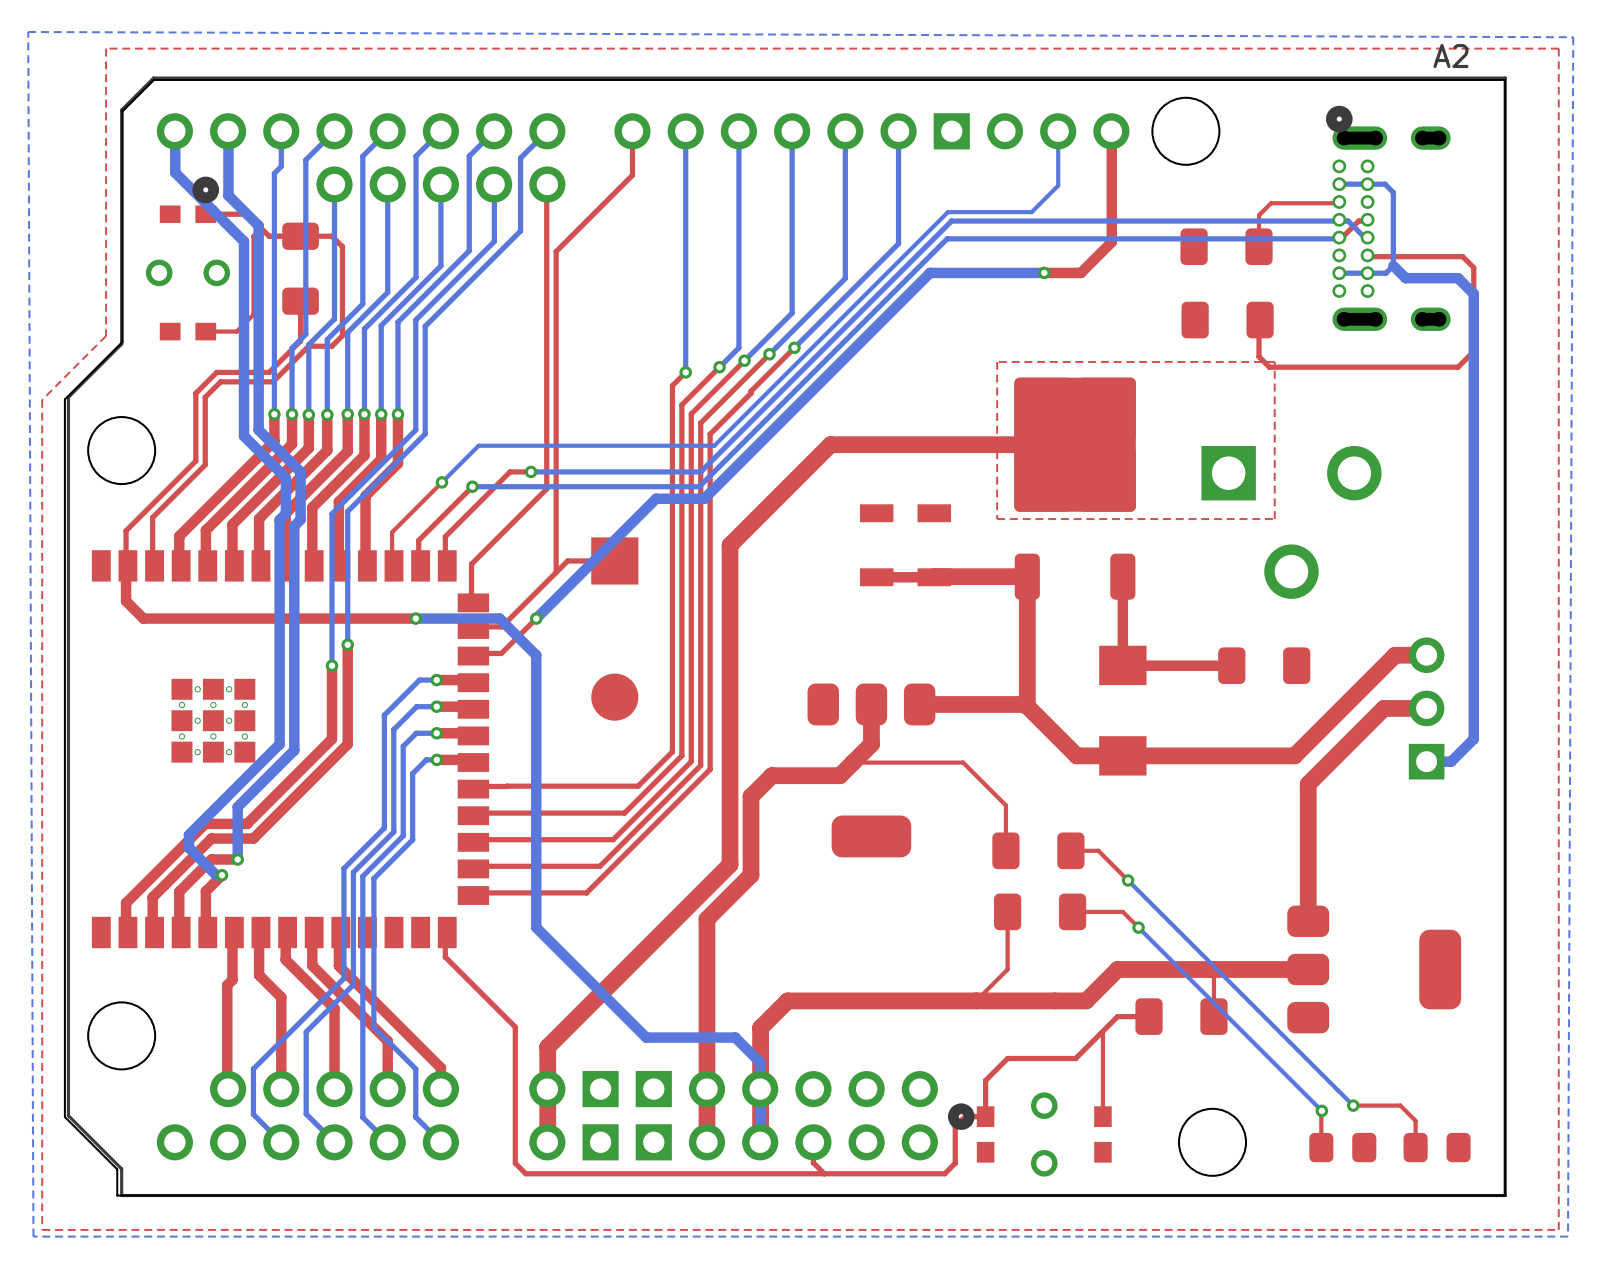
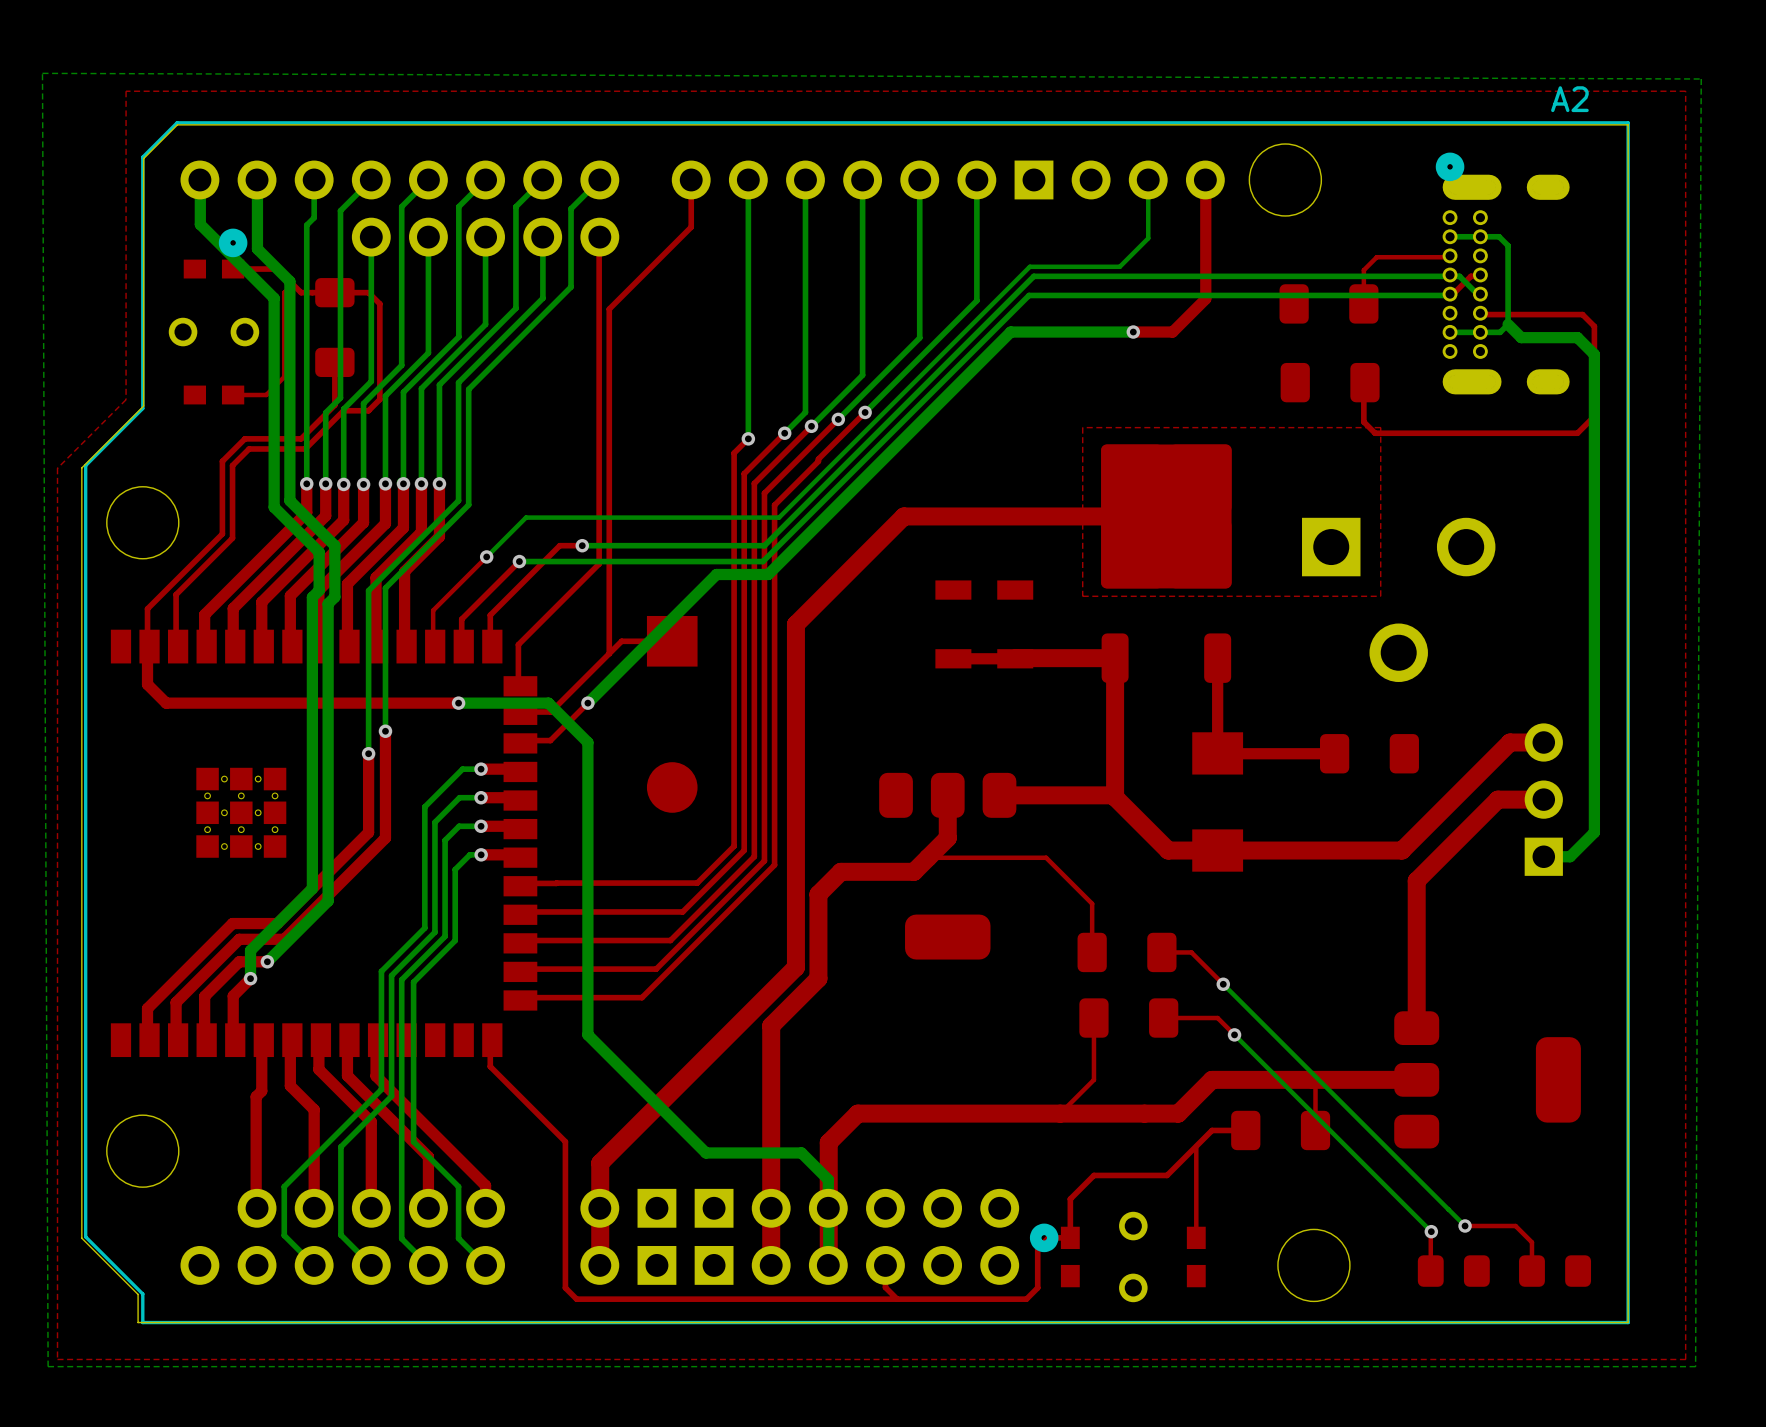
bottom track: (279, 744) (188, 834) (188, 847) (216, 875) (222, 875) -> (312, 838) (312, 888) (250, 950) (250, 978)
bottom track: (294, 750) (237, 806) (237, 859) -> (328, 844) (328, 901) (267, 961)

